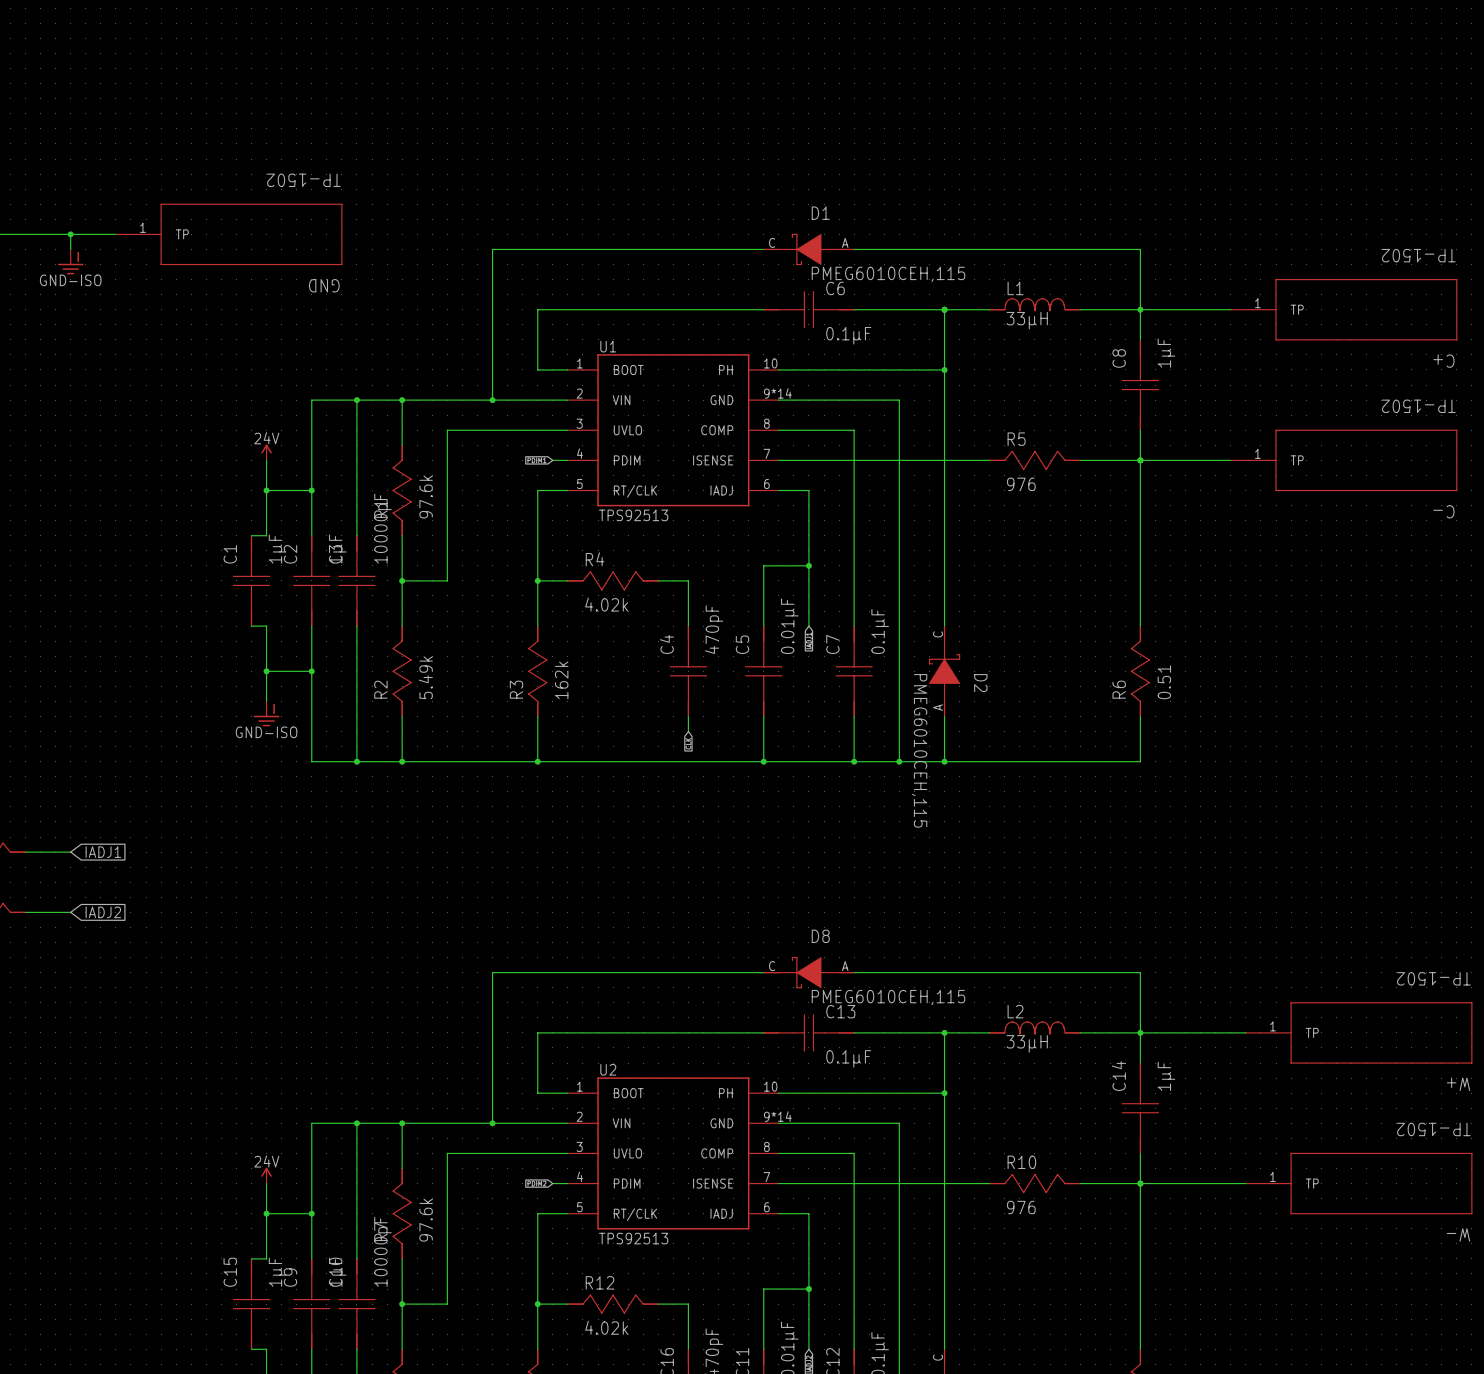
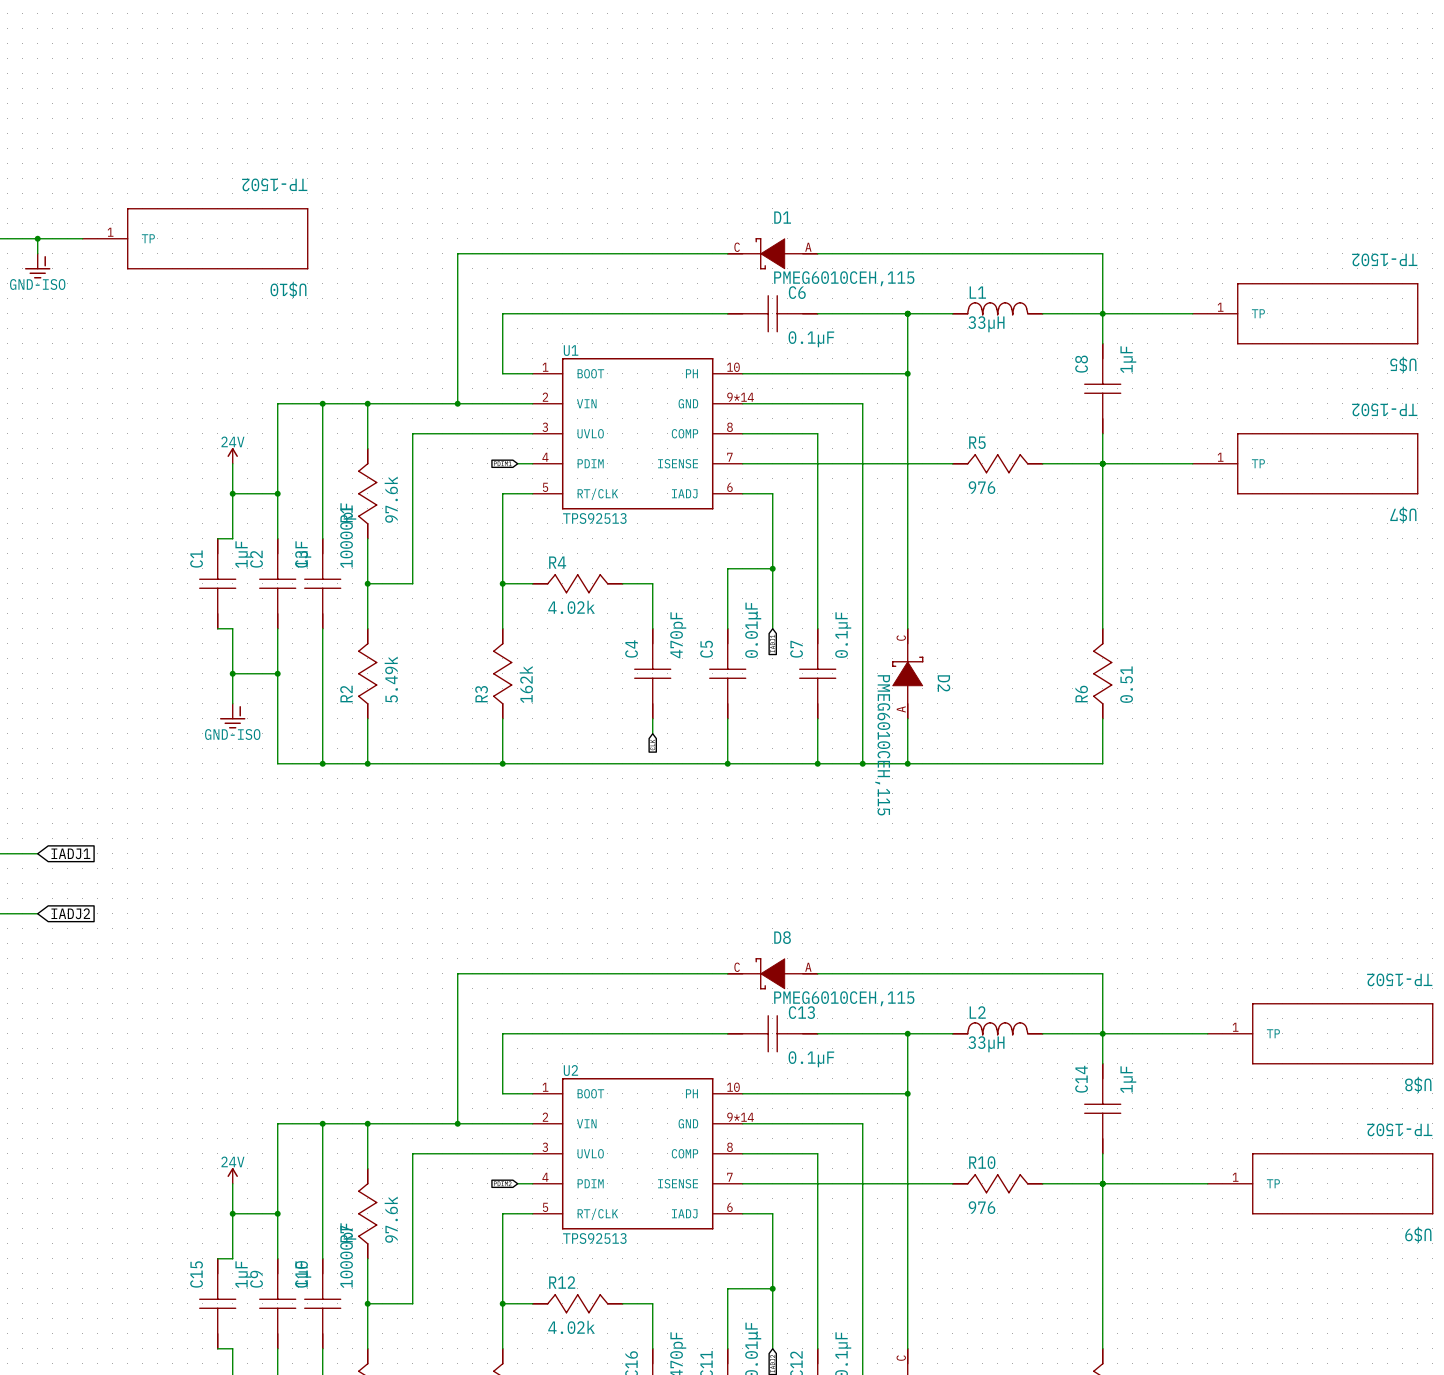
GND name: GND (324, 285) -> U$10 (288, 289)
C+ name: C+ (1443, 361) -> U$5 (1403, 364)
C- name: C- (1443, 511) -> U$7 (1403, 514)
W+ name: W+ (1458, 1084) -> U$8 (1418, 1084)
W- name: W- (1458, 1234) -> U$9 (1418, 1234)

